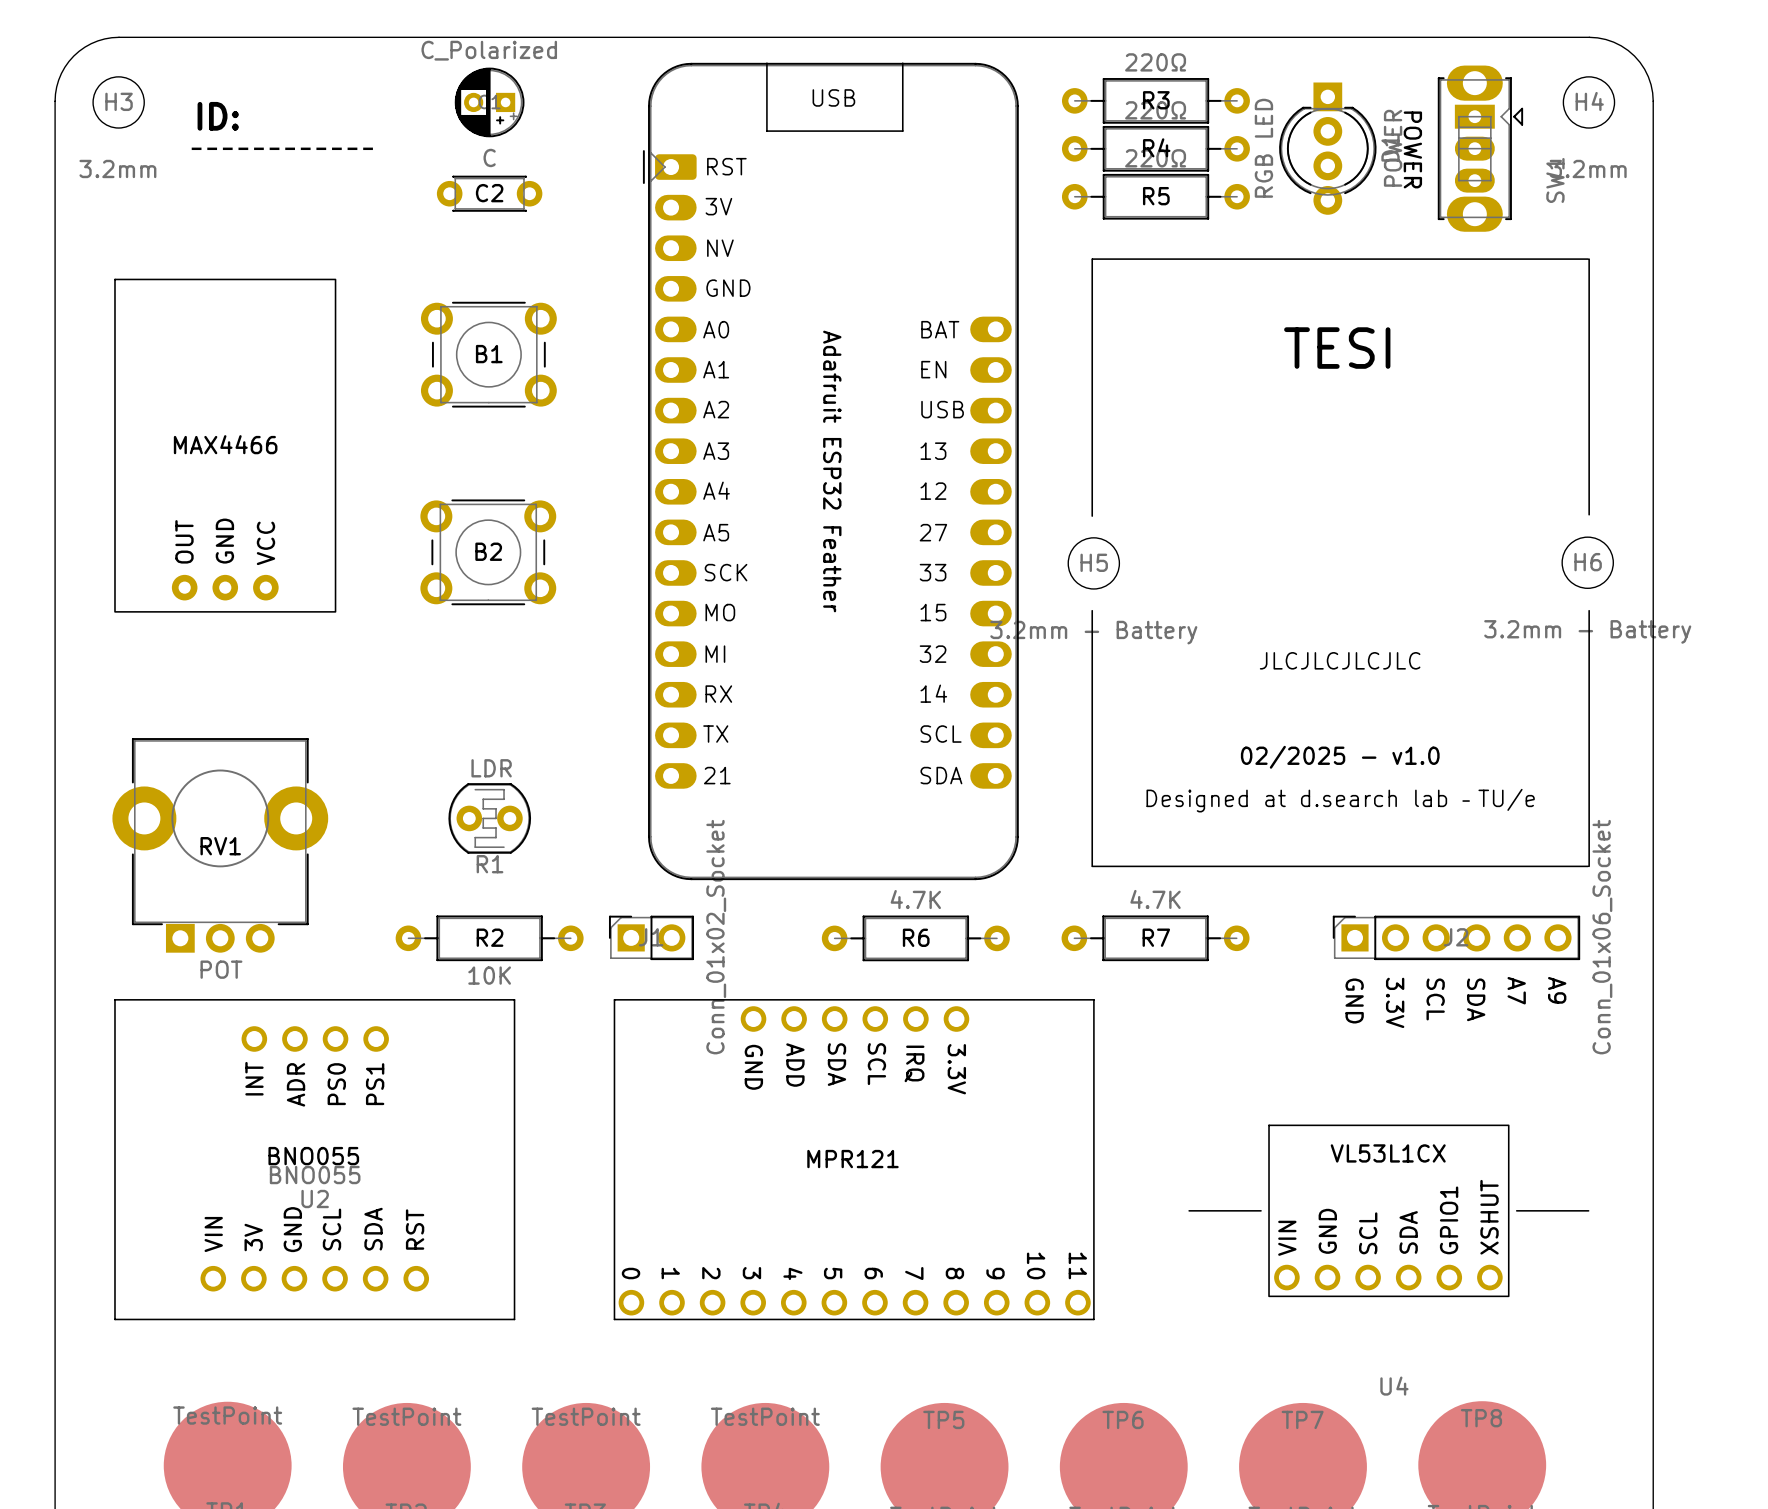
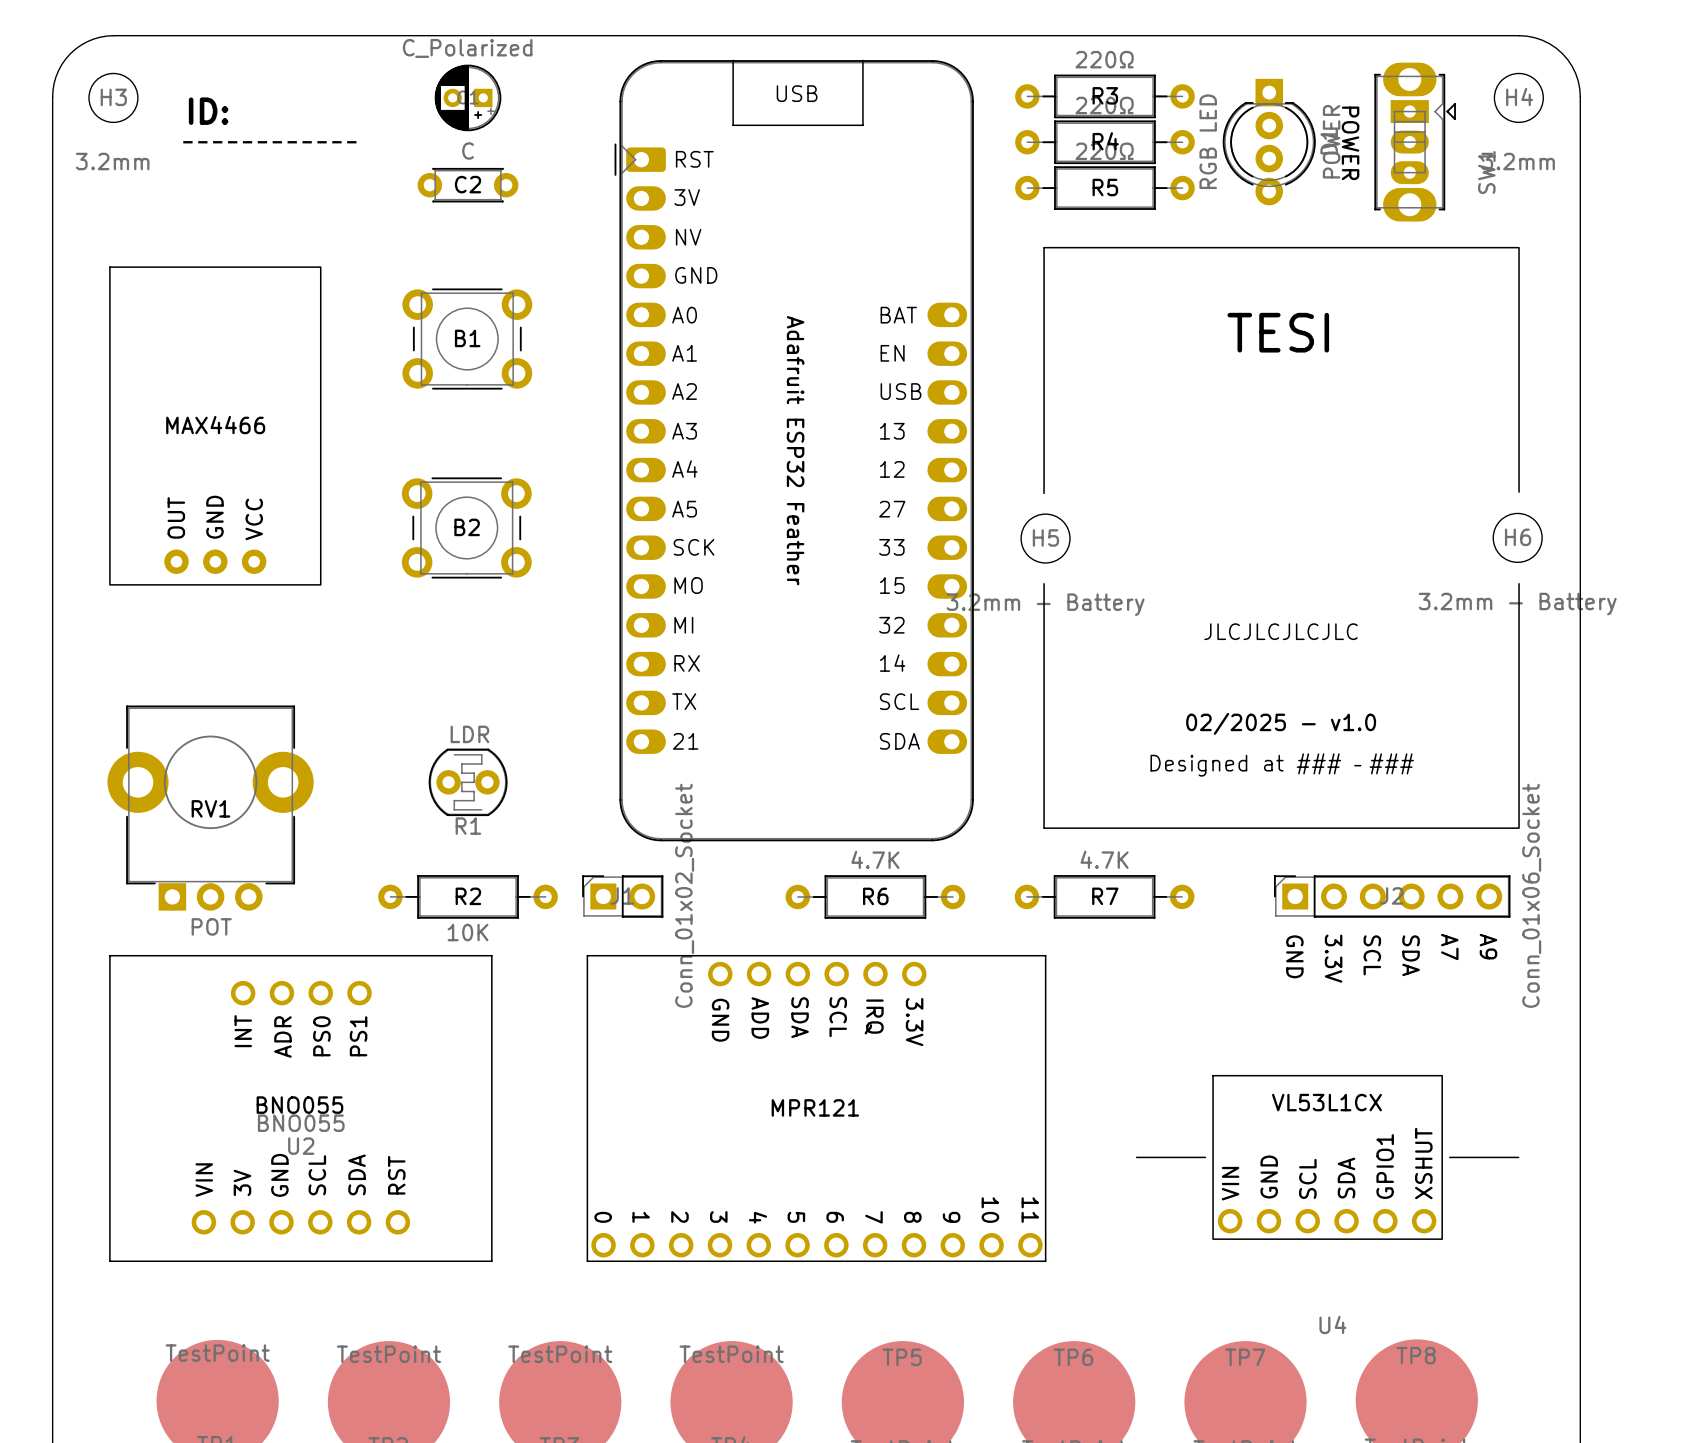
text: Designed at d.search lab – TU/e (1340, 800) -> Designed at ### – ### (1282, 764)

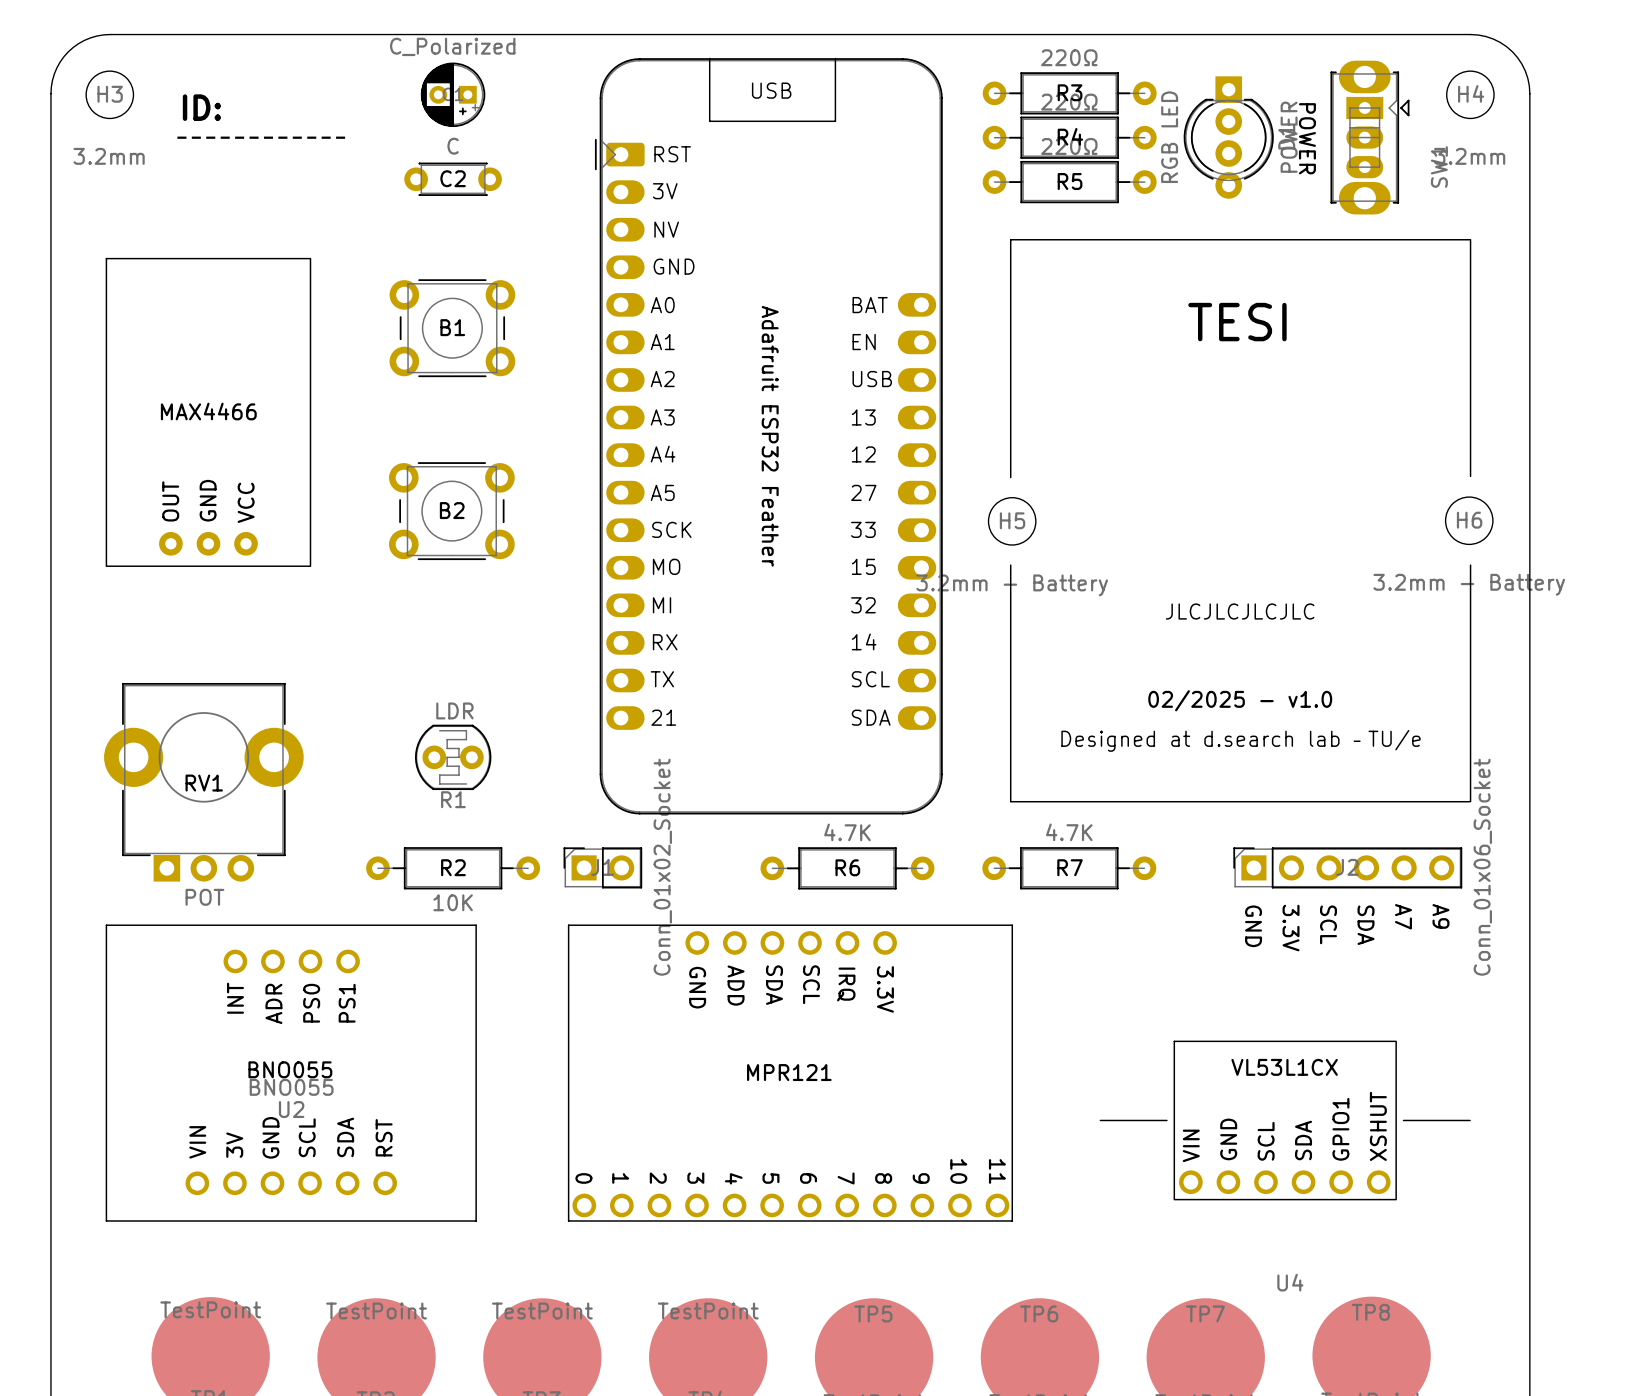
text: Designed at ### – ### (1282, 764) -> Designed at d.search lab – TU/e (1240, 740)

